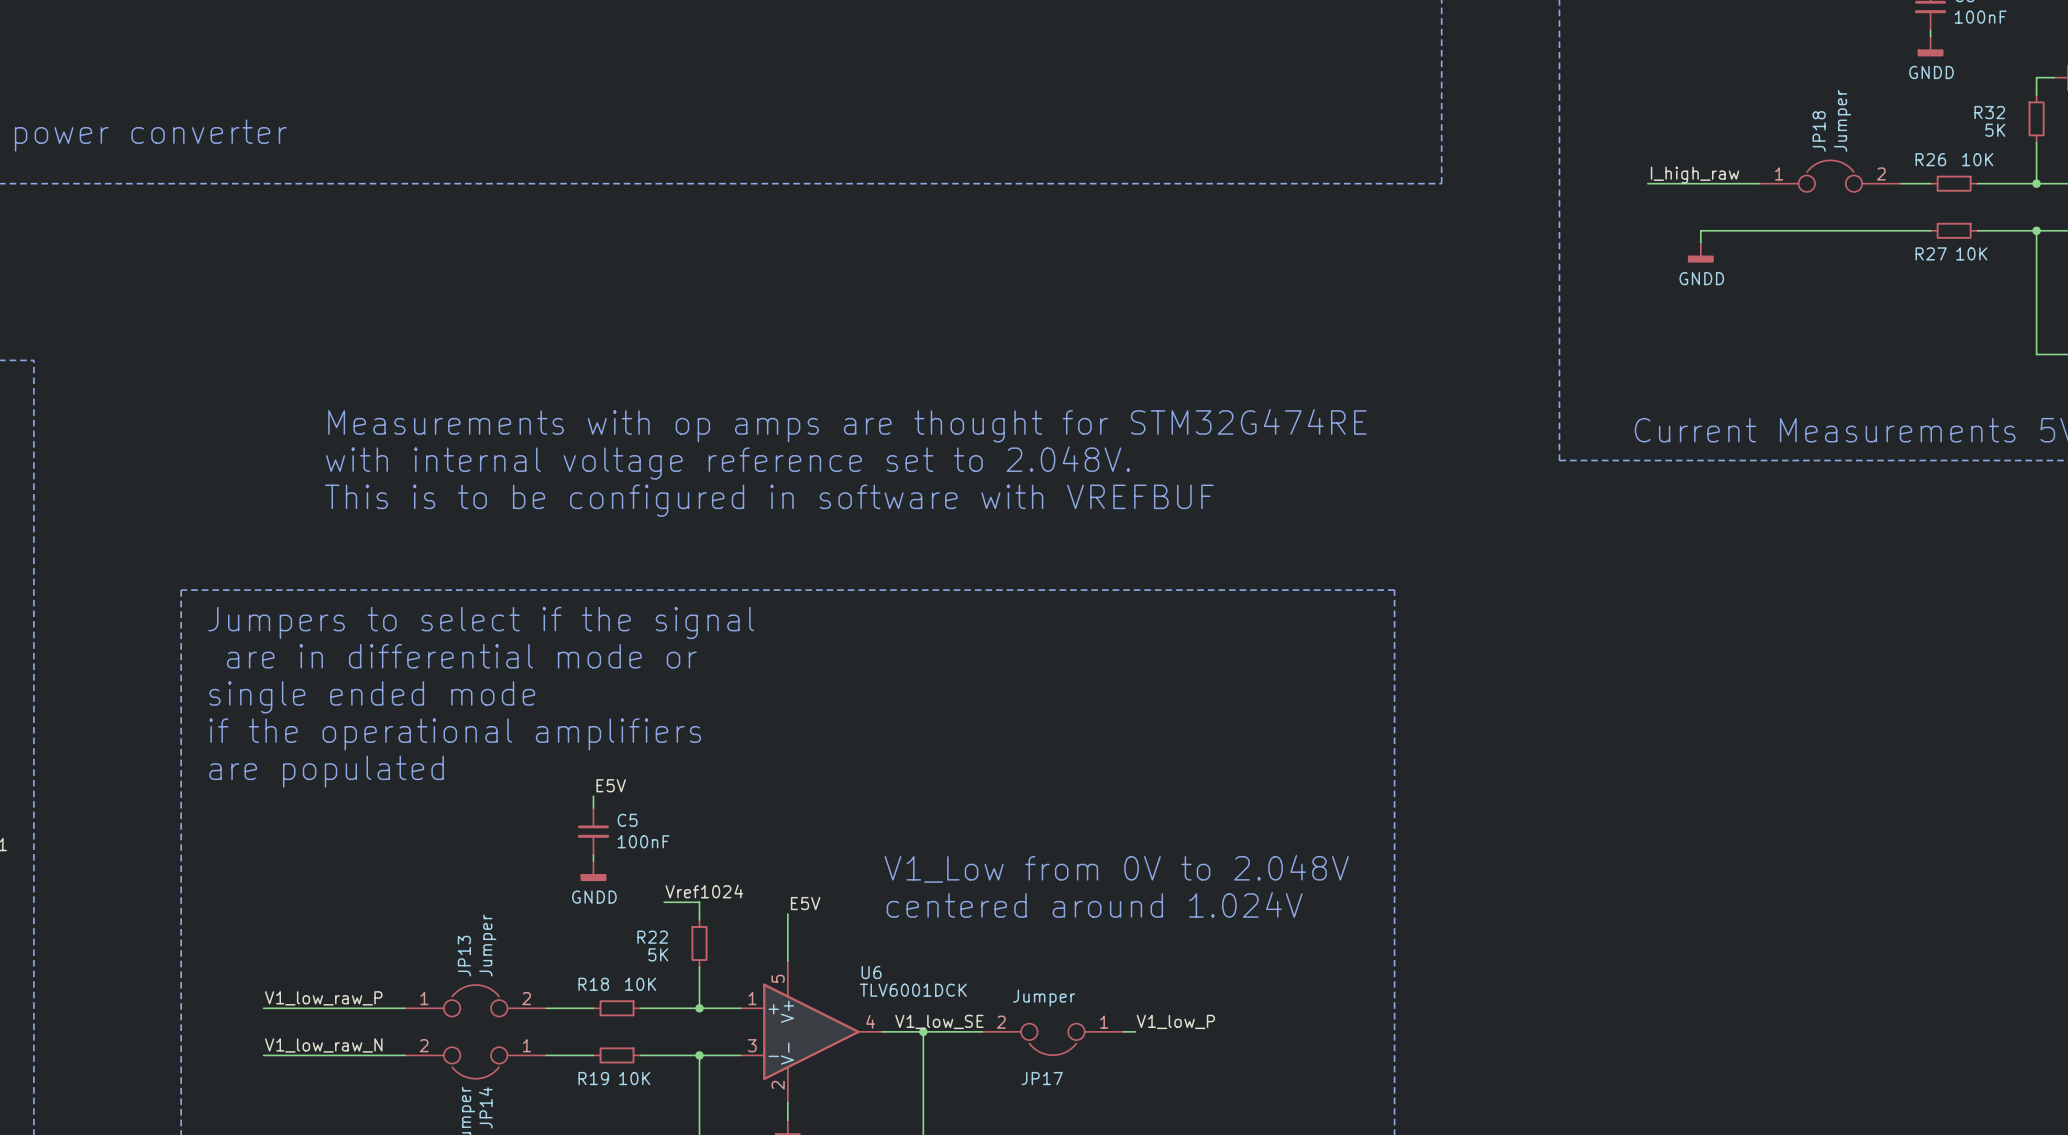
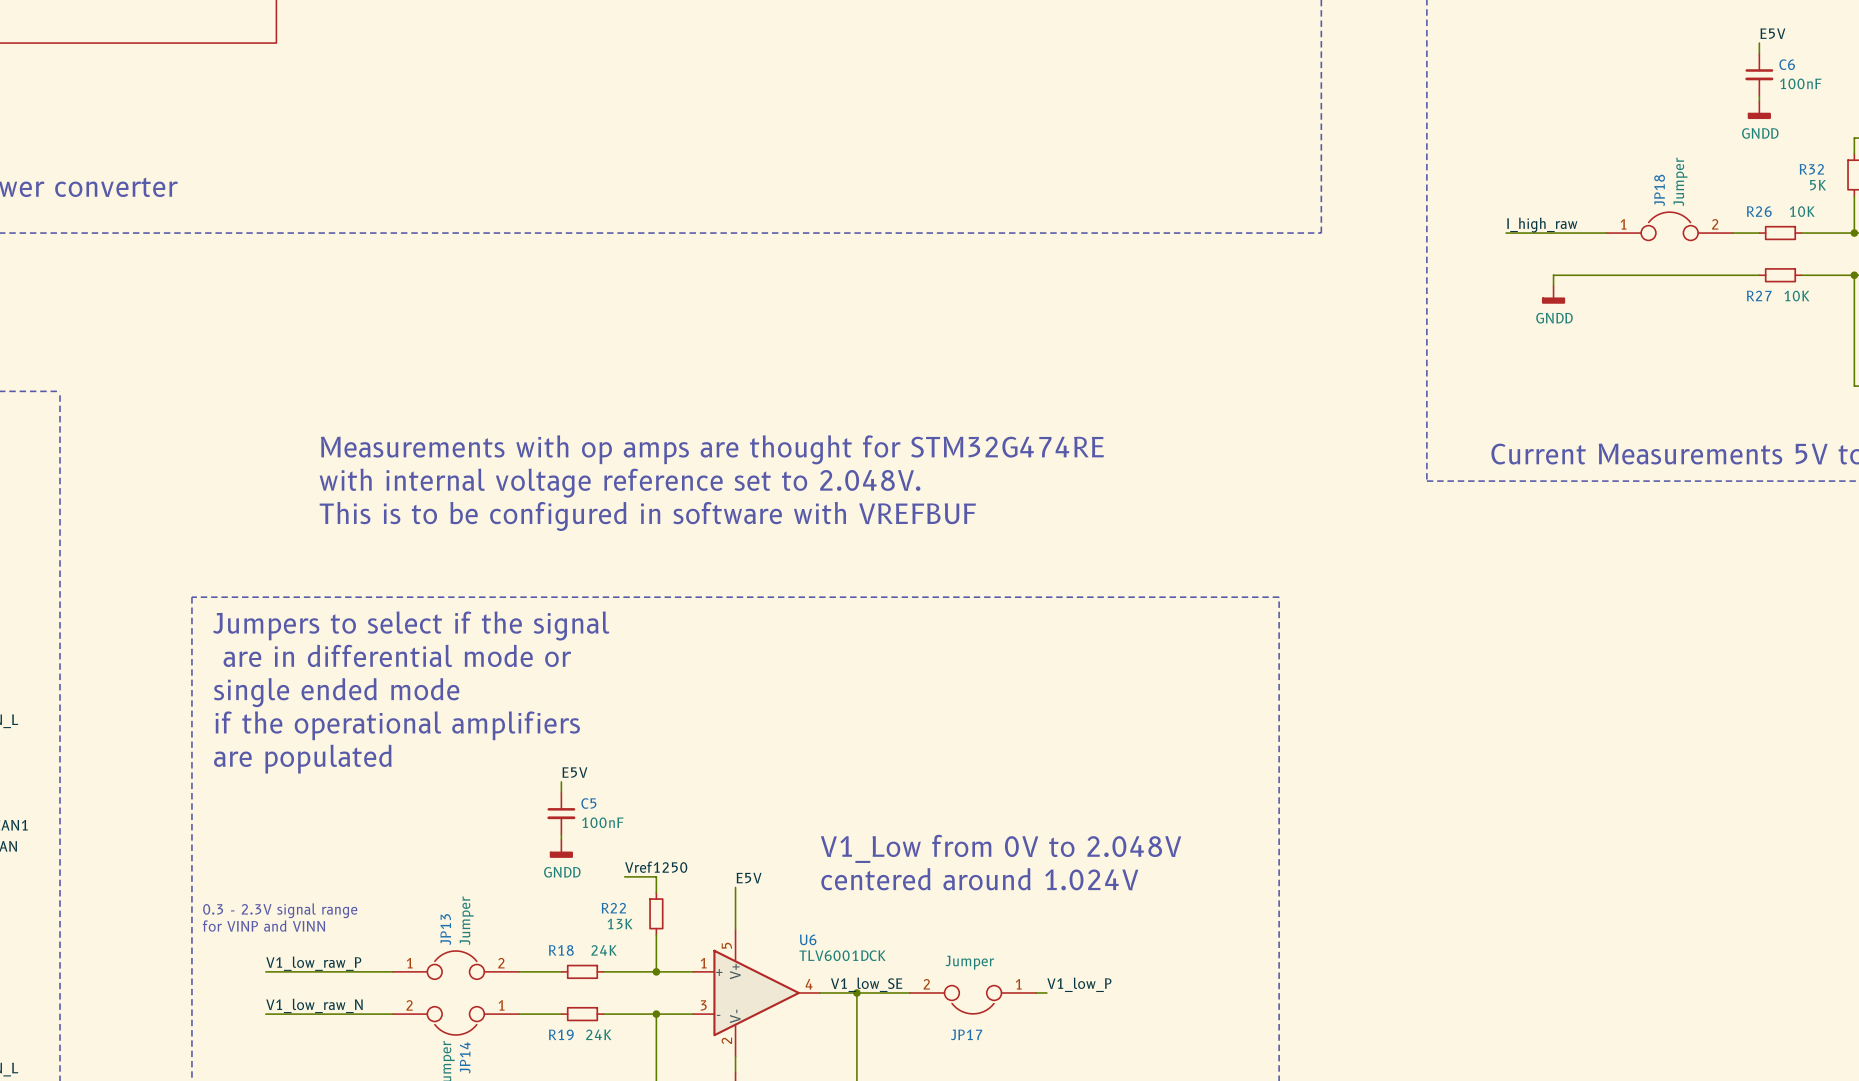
label: Vref1024 (704, 891) -> Vref1250 (656, 867)
text: none -> 0.3 - 2.3V signal range (280, 910)
R22 value: 5K (658, 954) -> 13K (620, 923)
text: none -> for VINP and VINN (263, 926)
R18 value: 10K (640, 984) -> 24K (604, 950)
R19 value: 10K (634, 1078) -> 24K (598, 1034)

